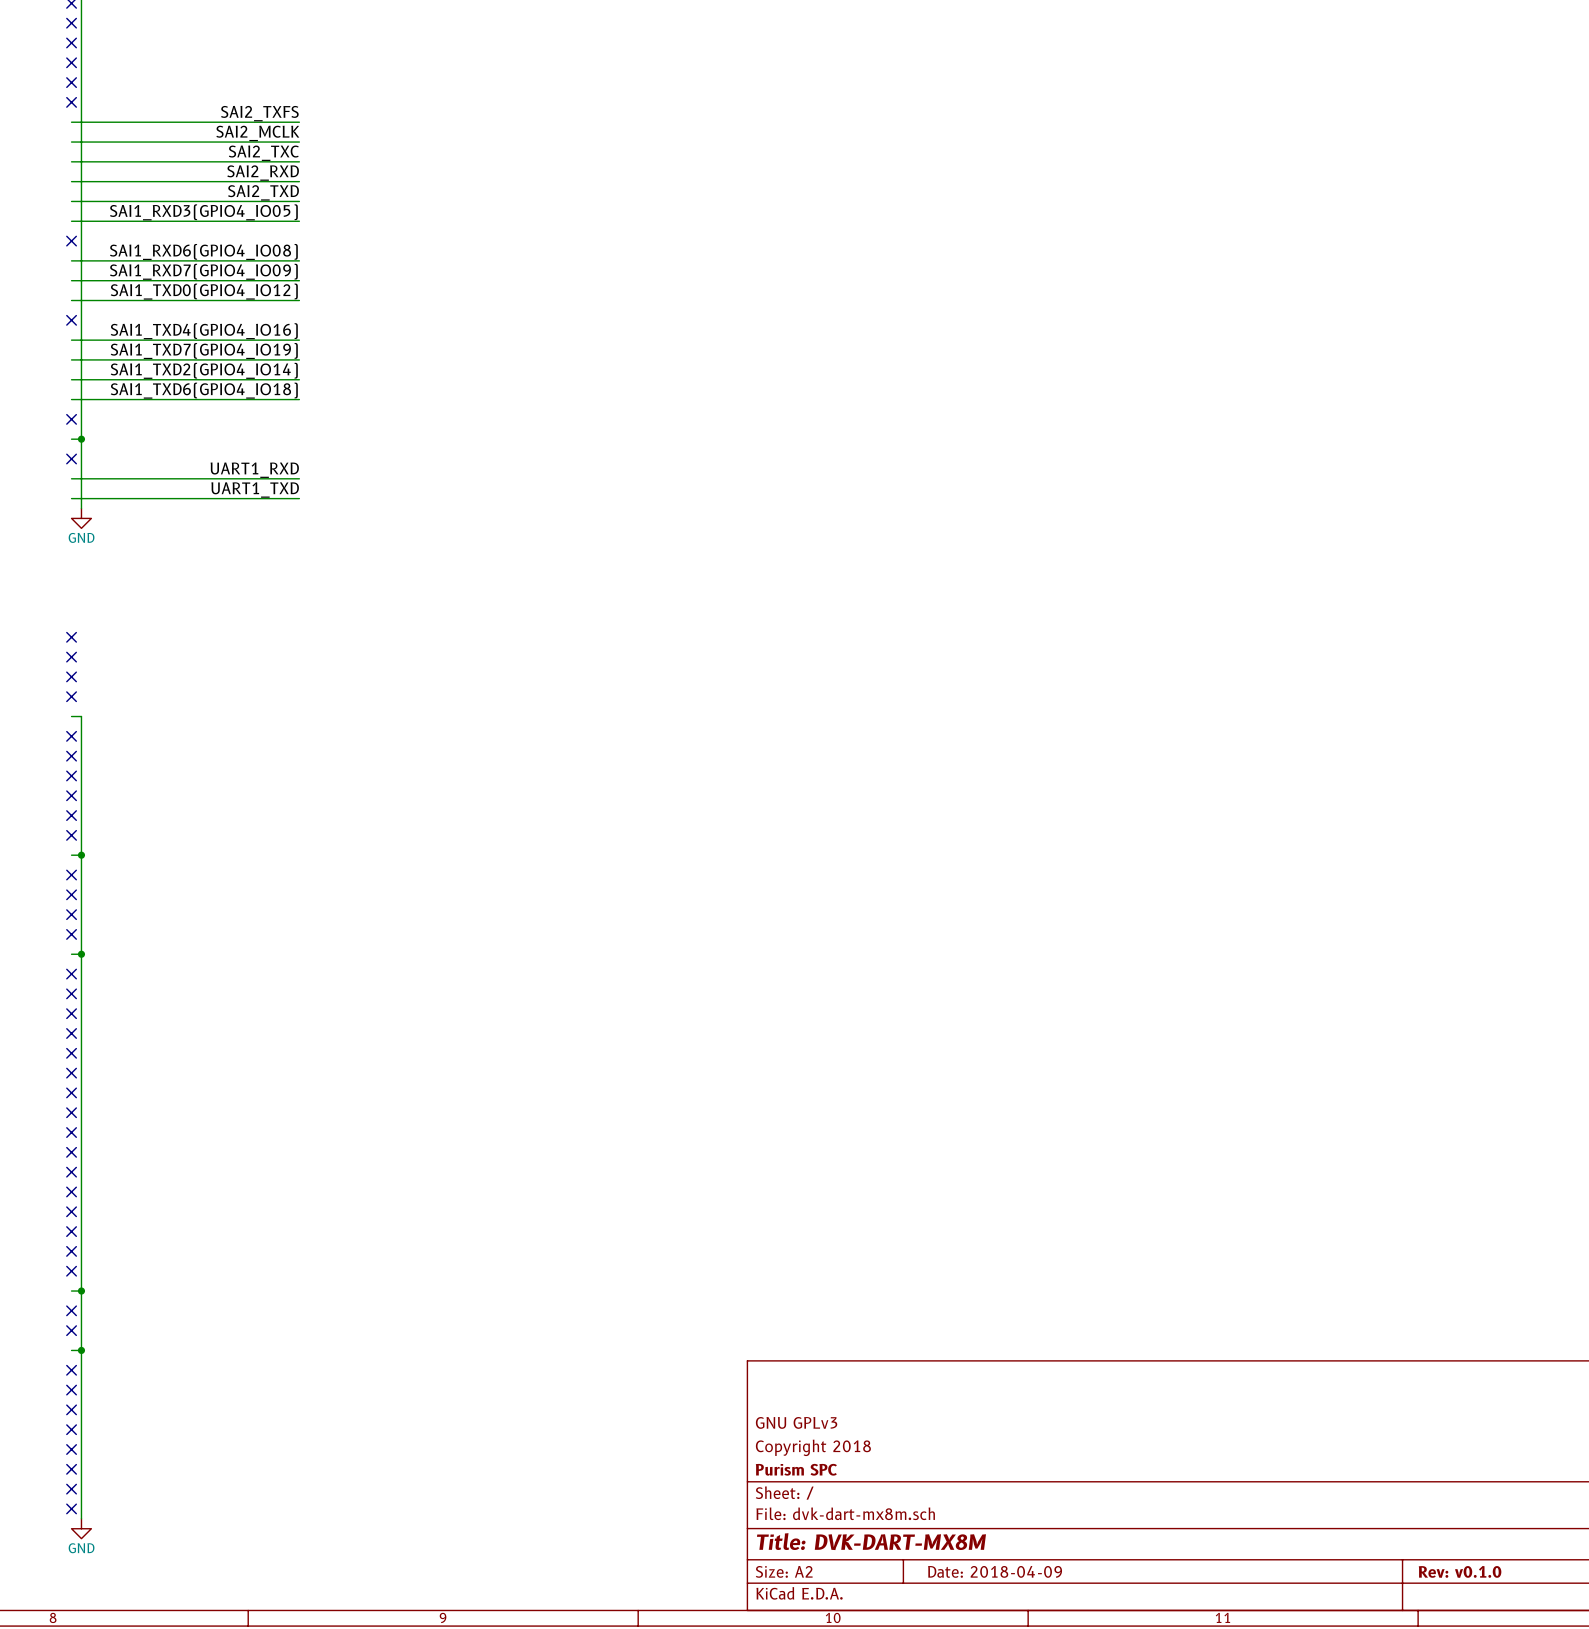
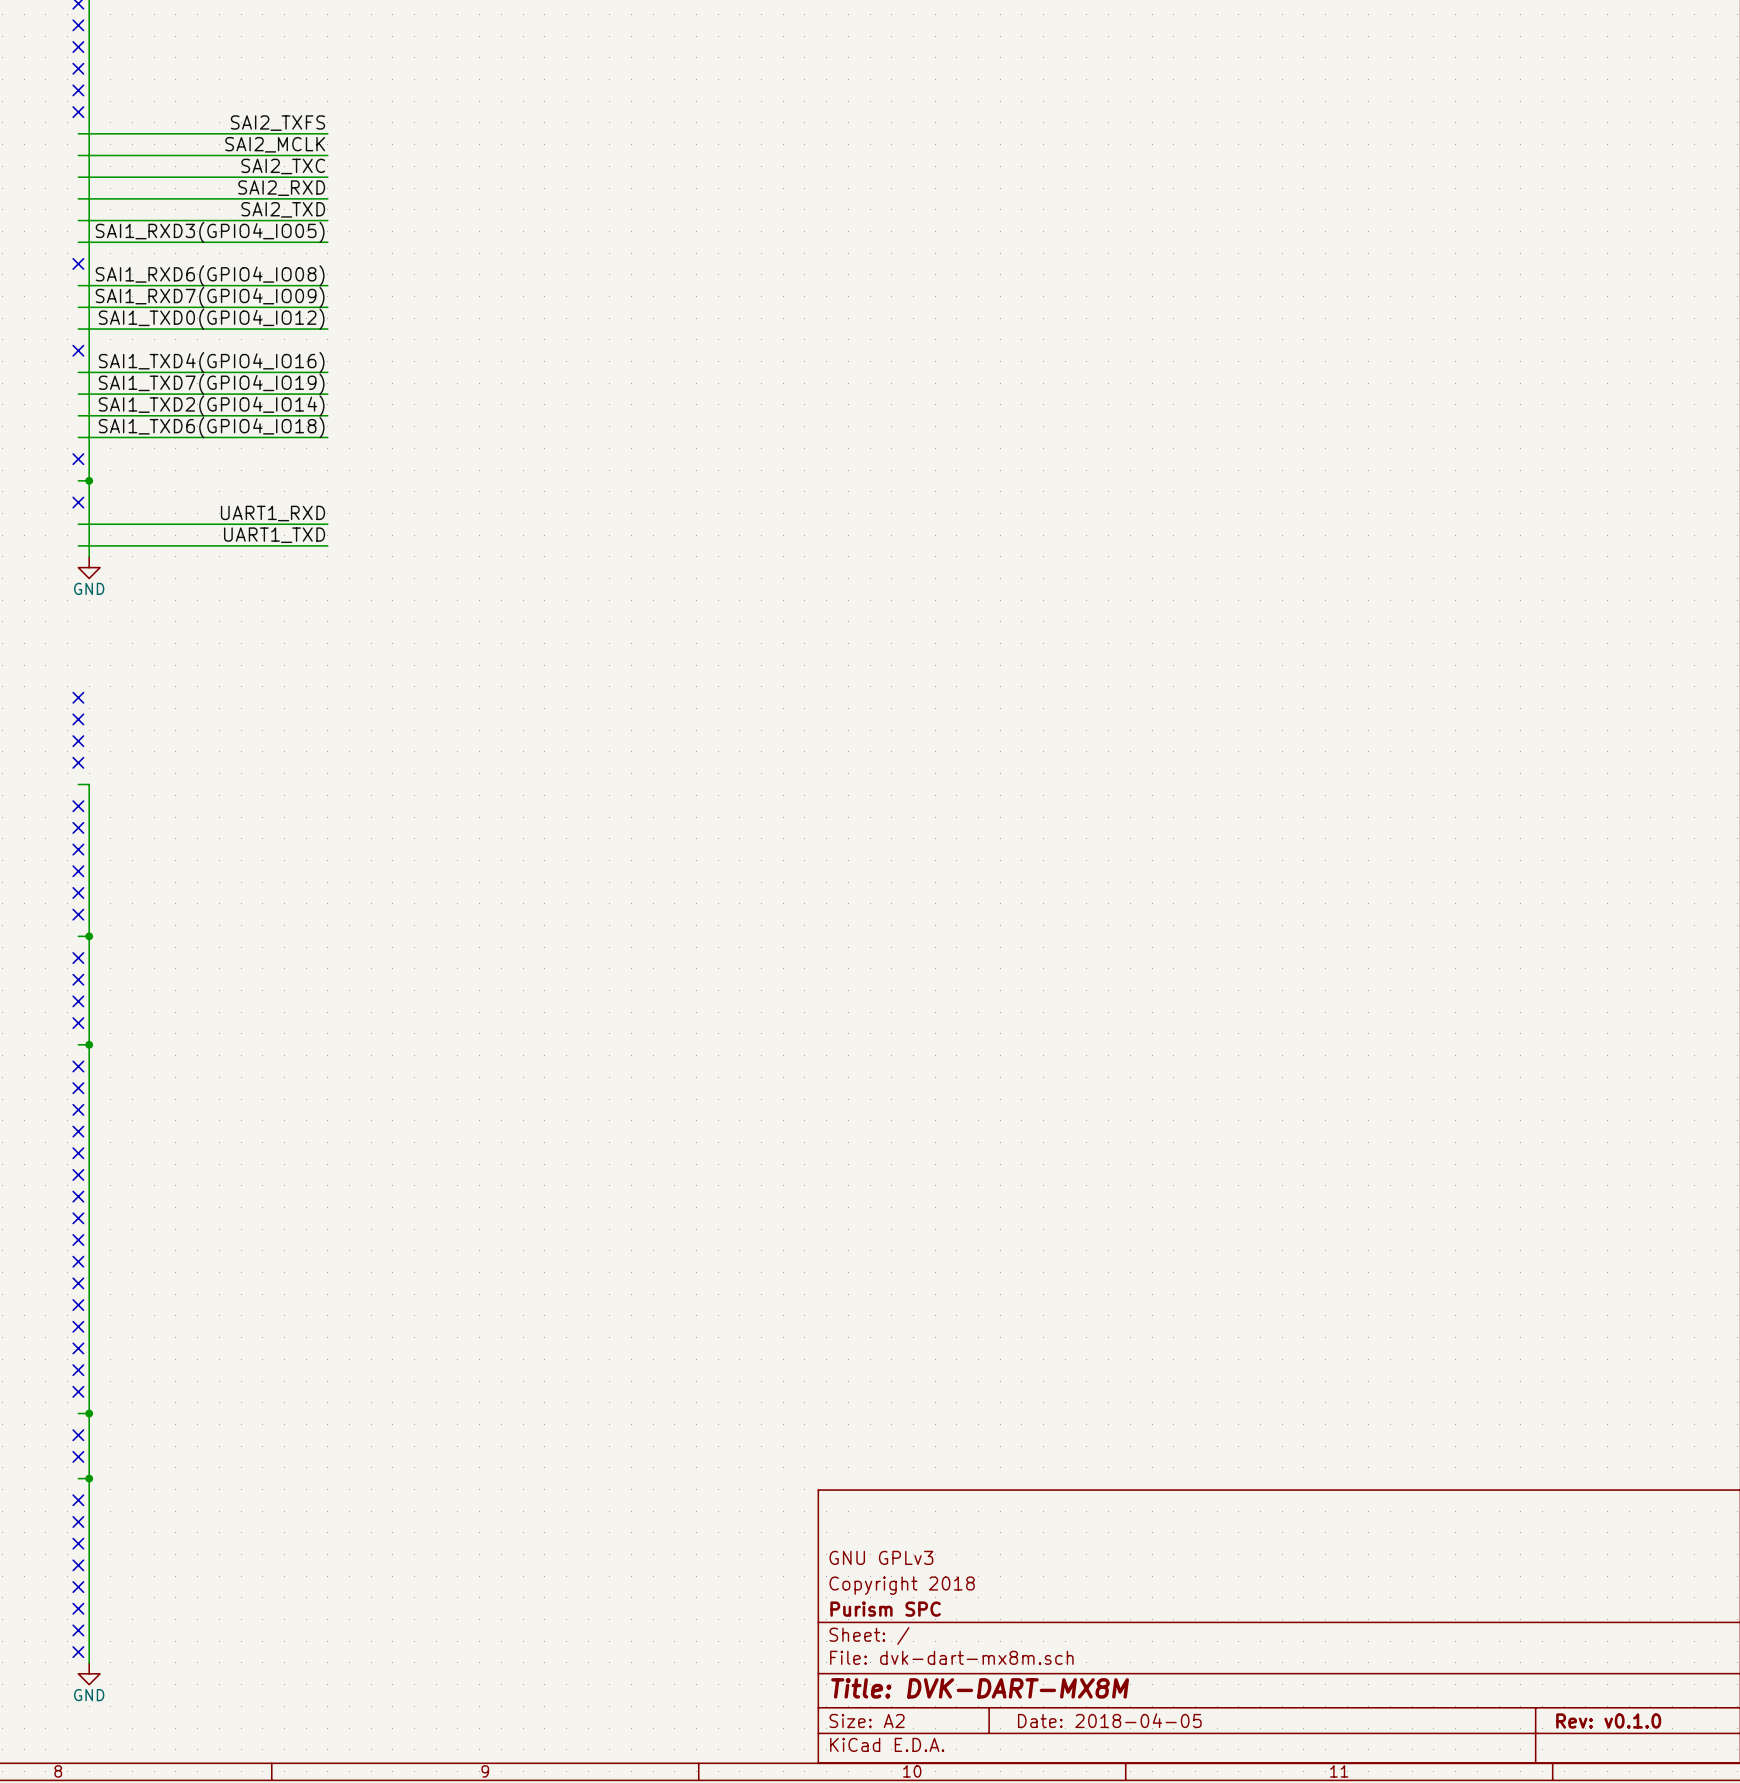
title block: Date: 2018-04-09 (995, 1571) -> Date: 2018-04-05 (1109, 1720)

